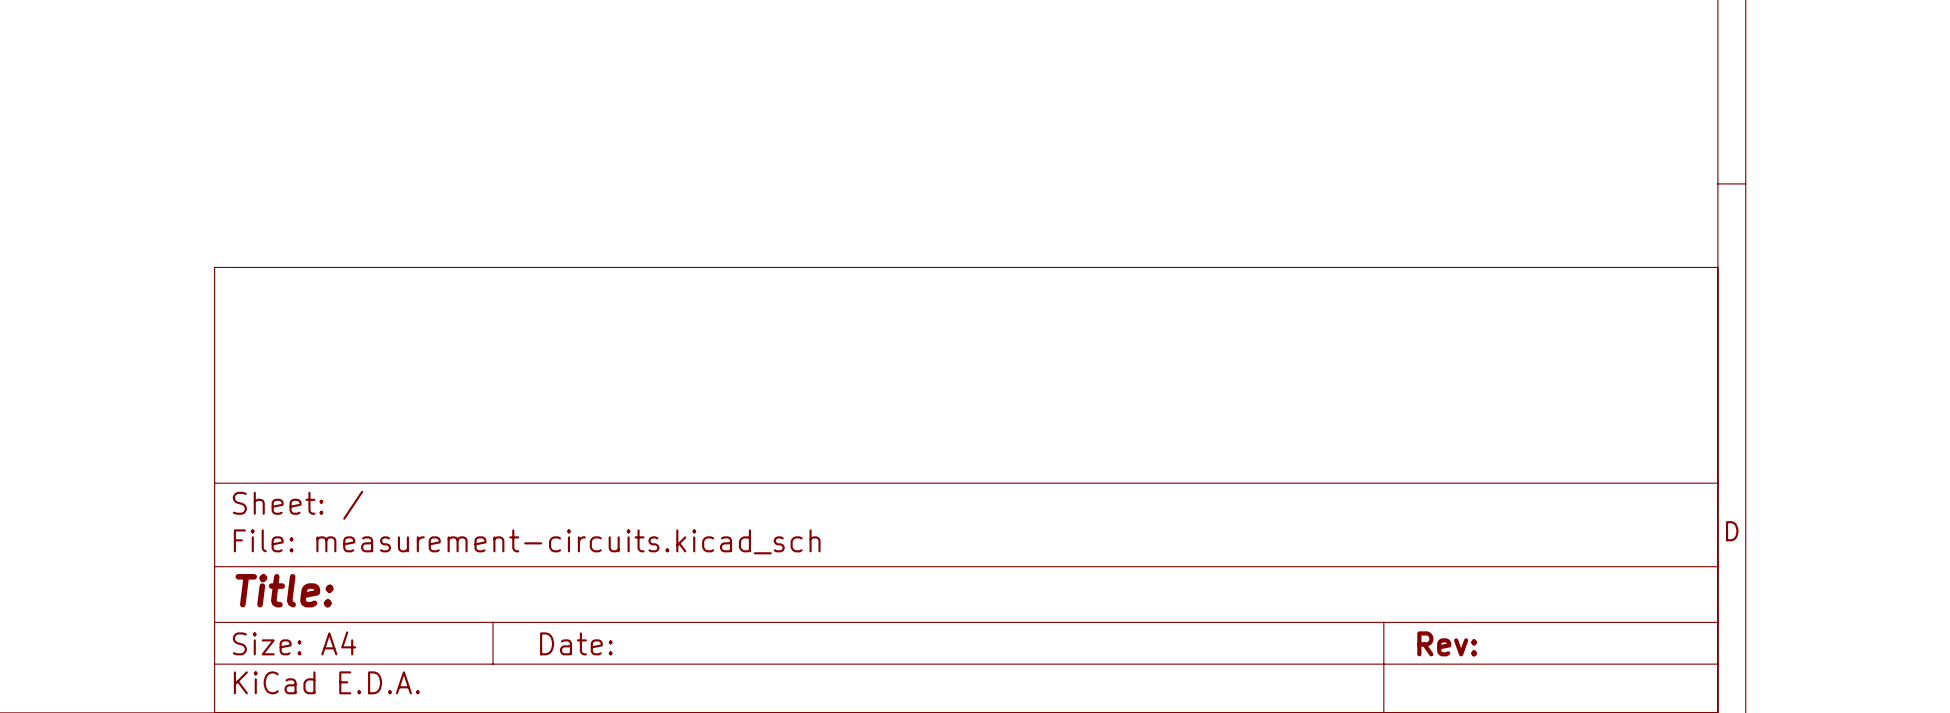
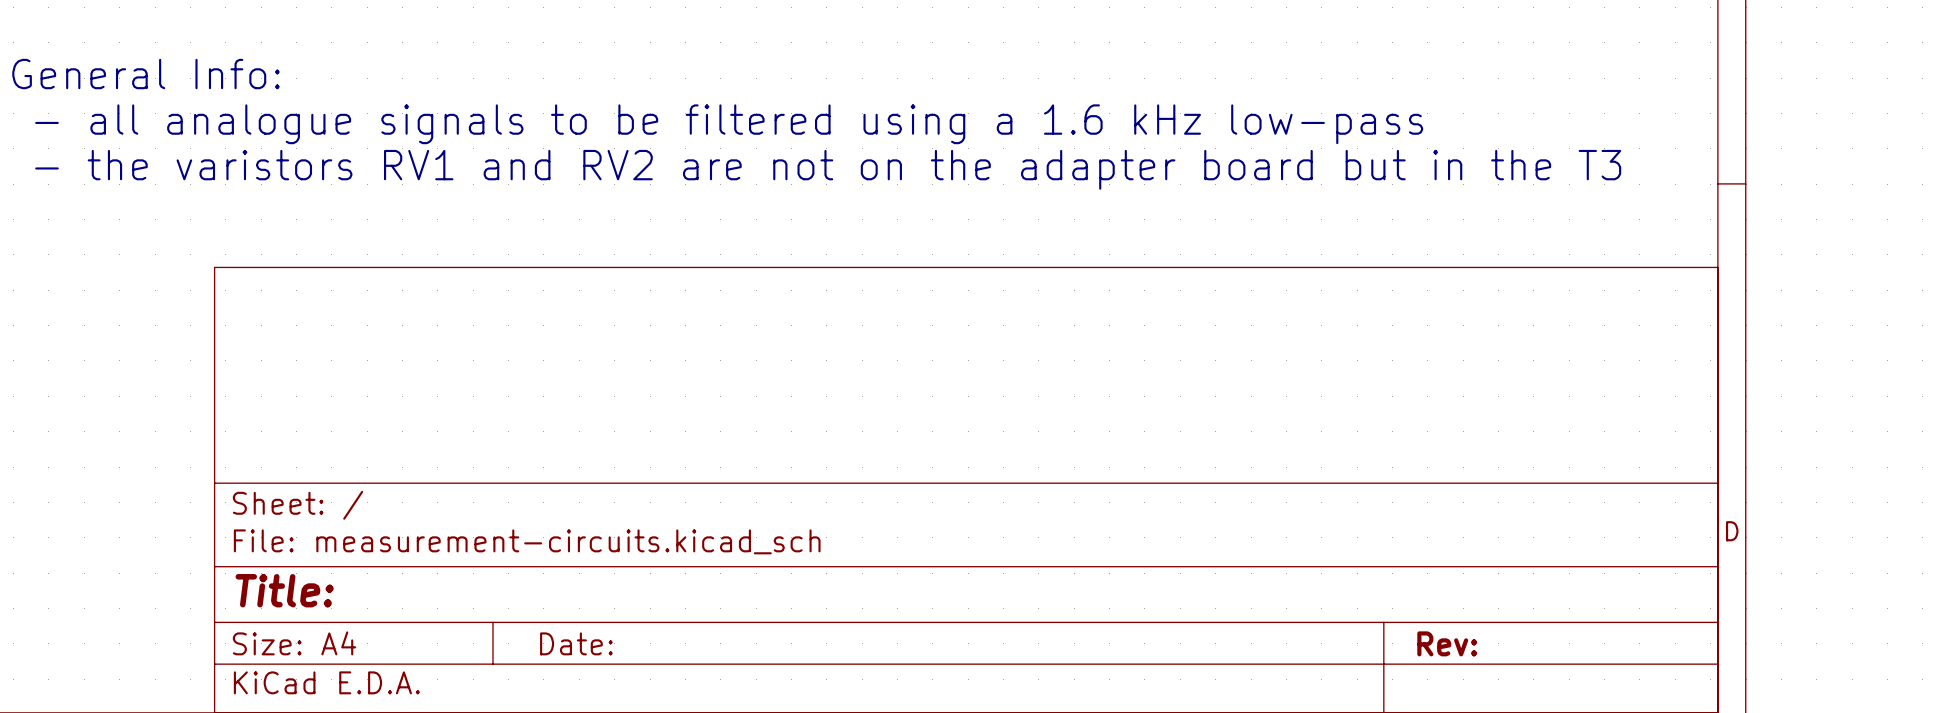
text: none -> General Info: (145, 74)
text: none -> - all analogue signals to be filtered using a 1.6 kHz low-pass (729, 124)
text: none -> - the varistors RV1 and RV2 are not on the adapter board but in the T3 (828, 169)

